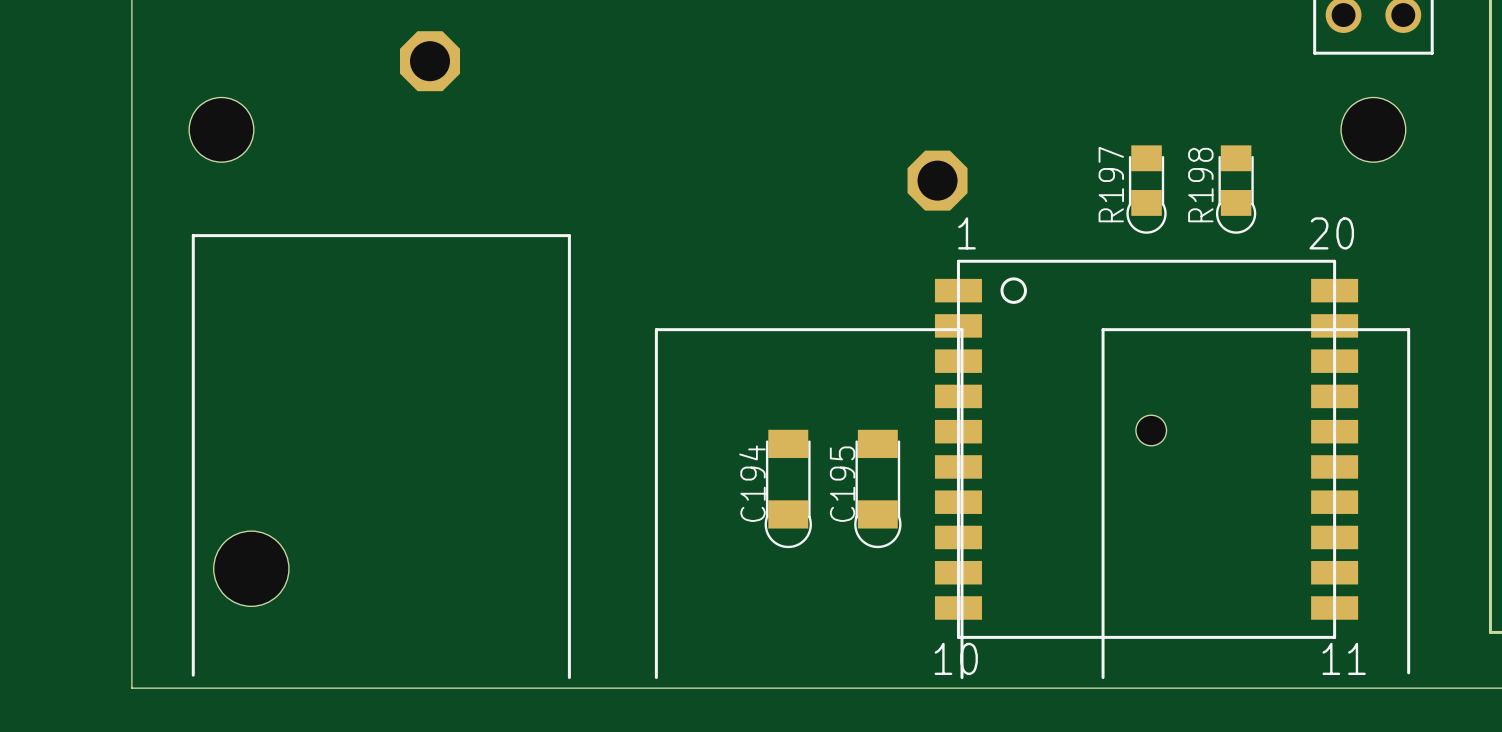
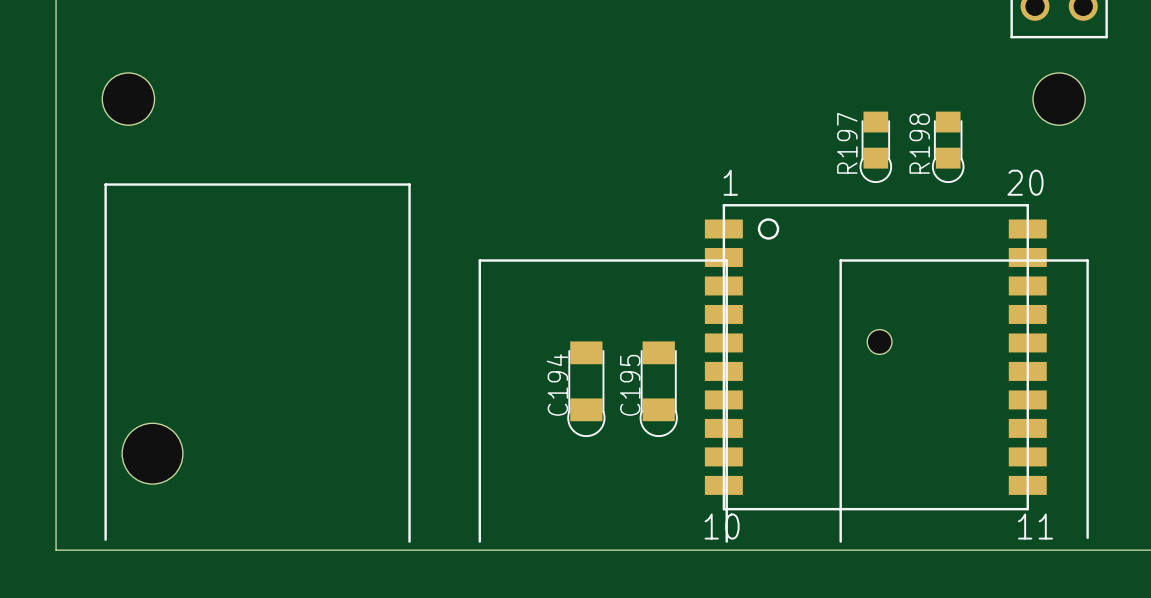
part: (430, 61) -> none
part: (937, 180) -> none

